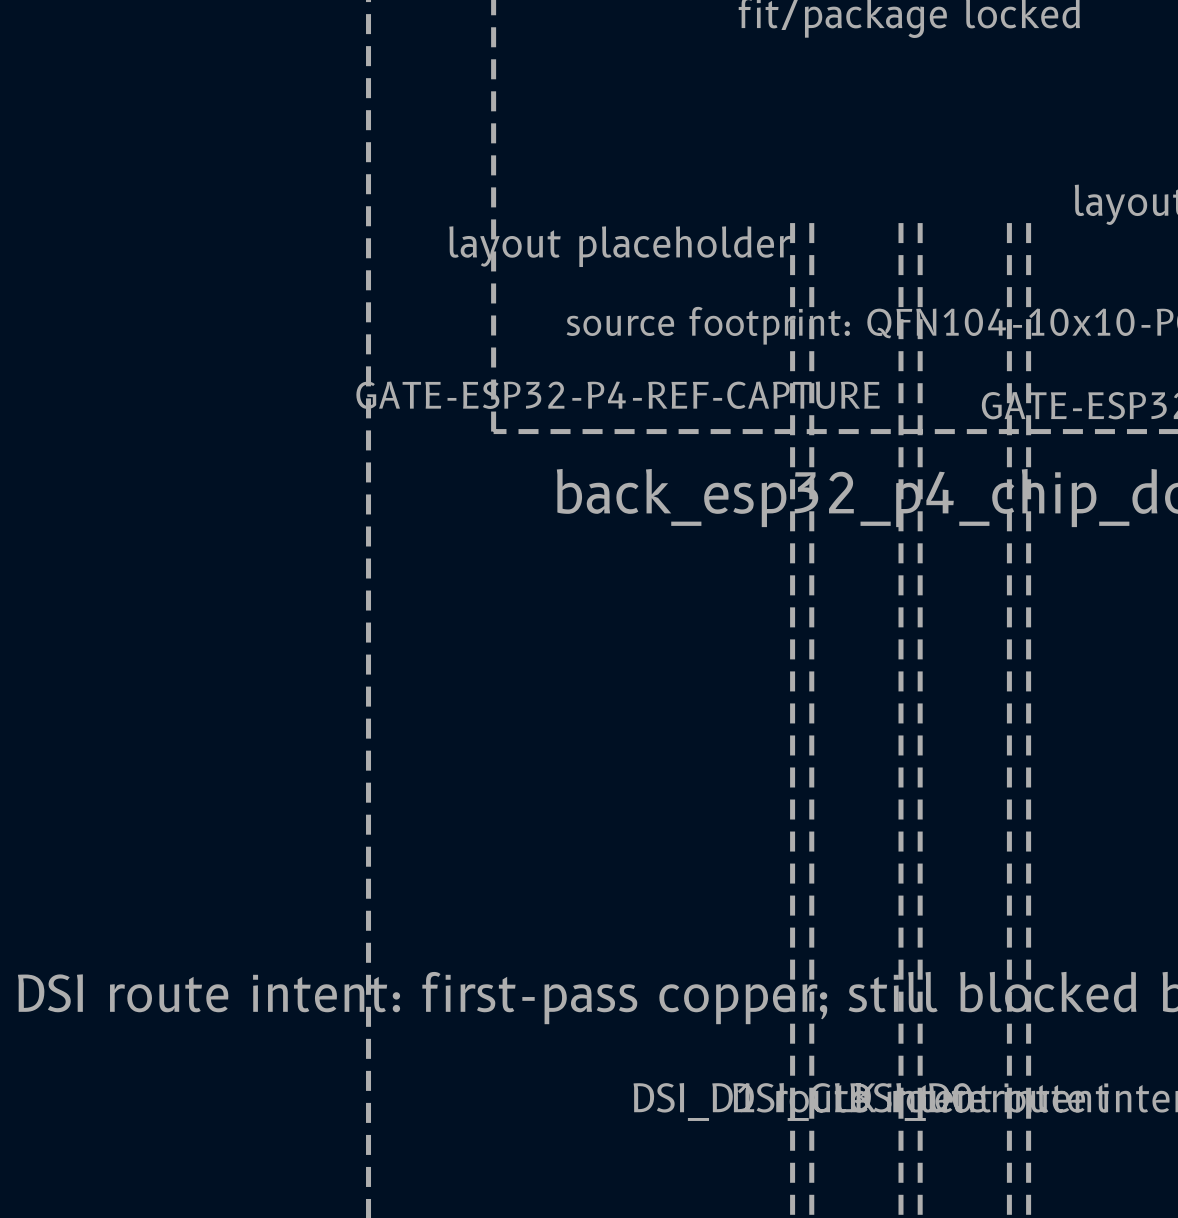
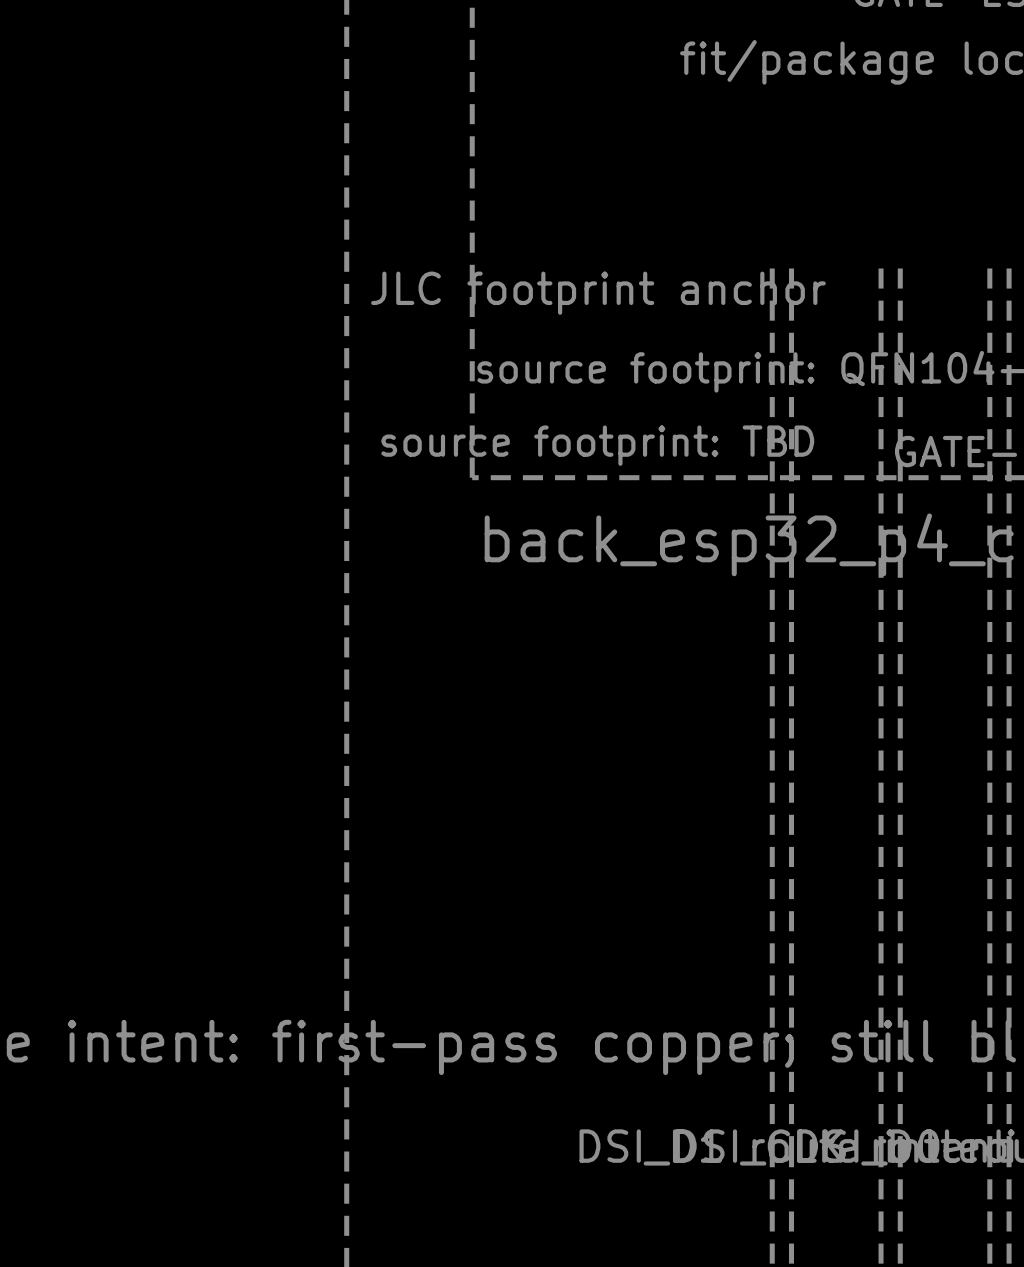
part text: layout placeholder (620, 246) -> JLC footprint anchor (598, 293)
part text: GATE-ESP32-P4-REF-CAPTURE (618, 395) -> source footprint: TBD (597, 445)

